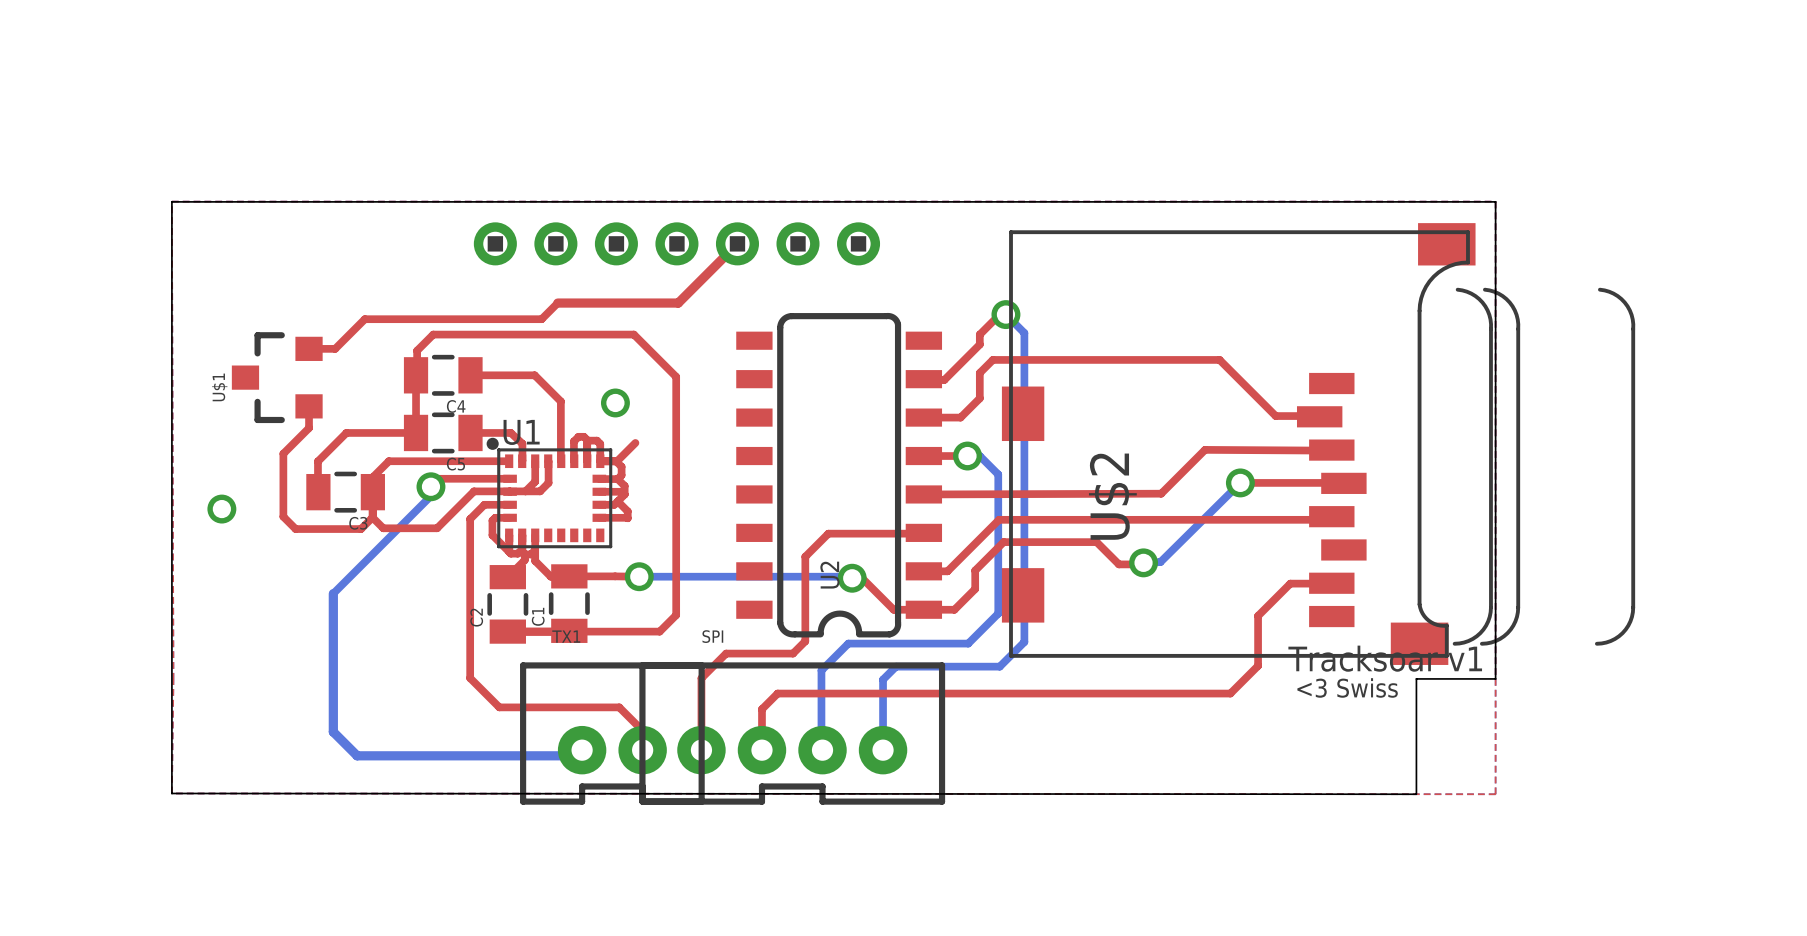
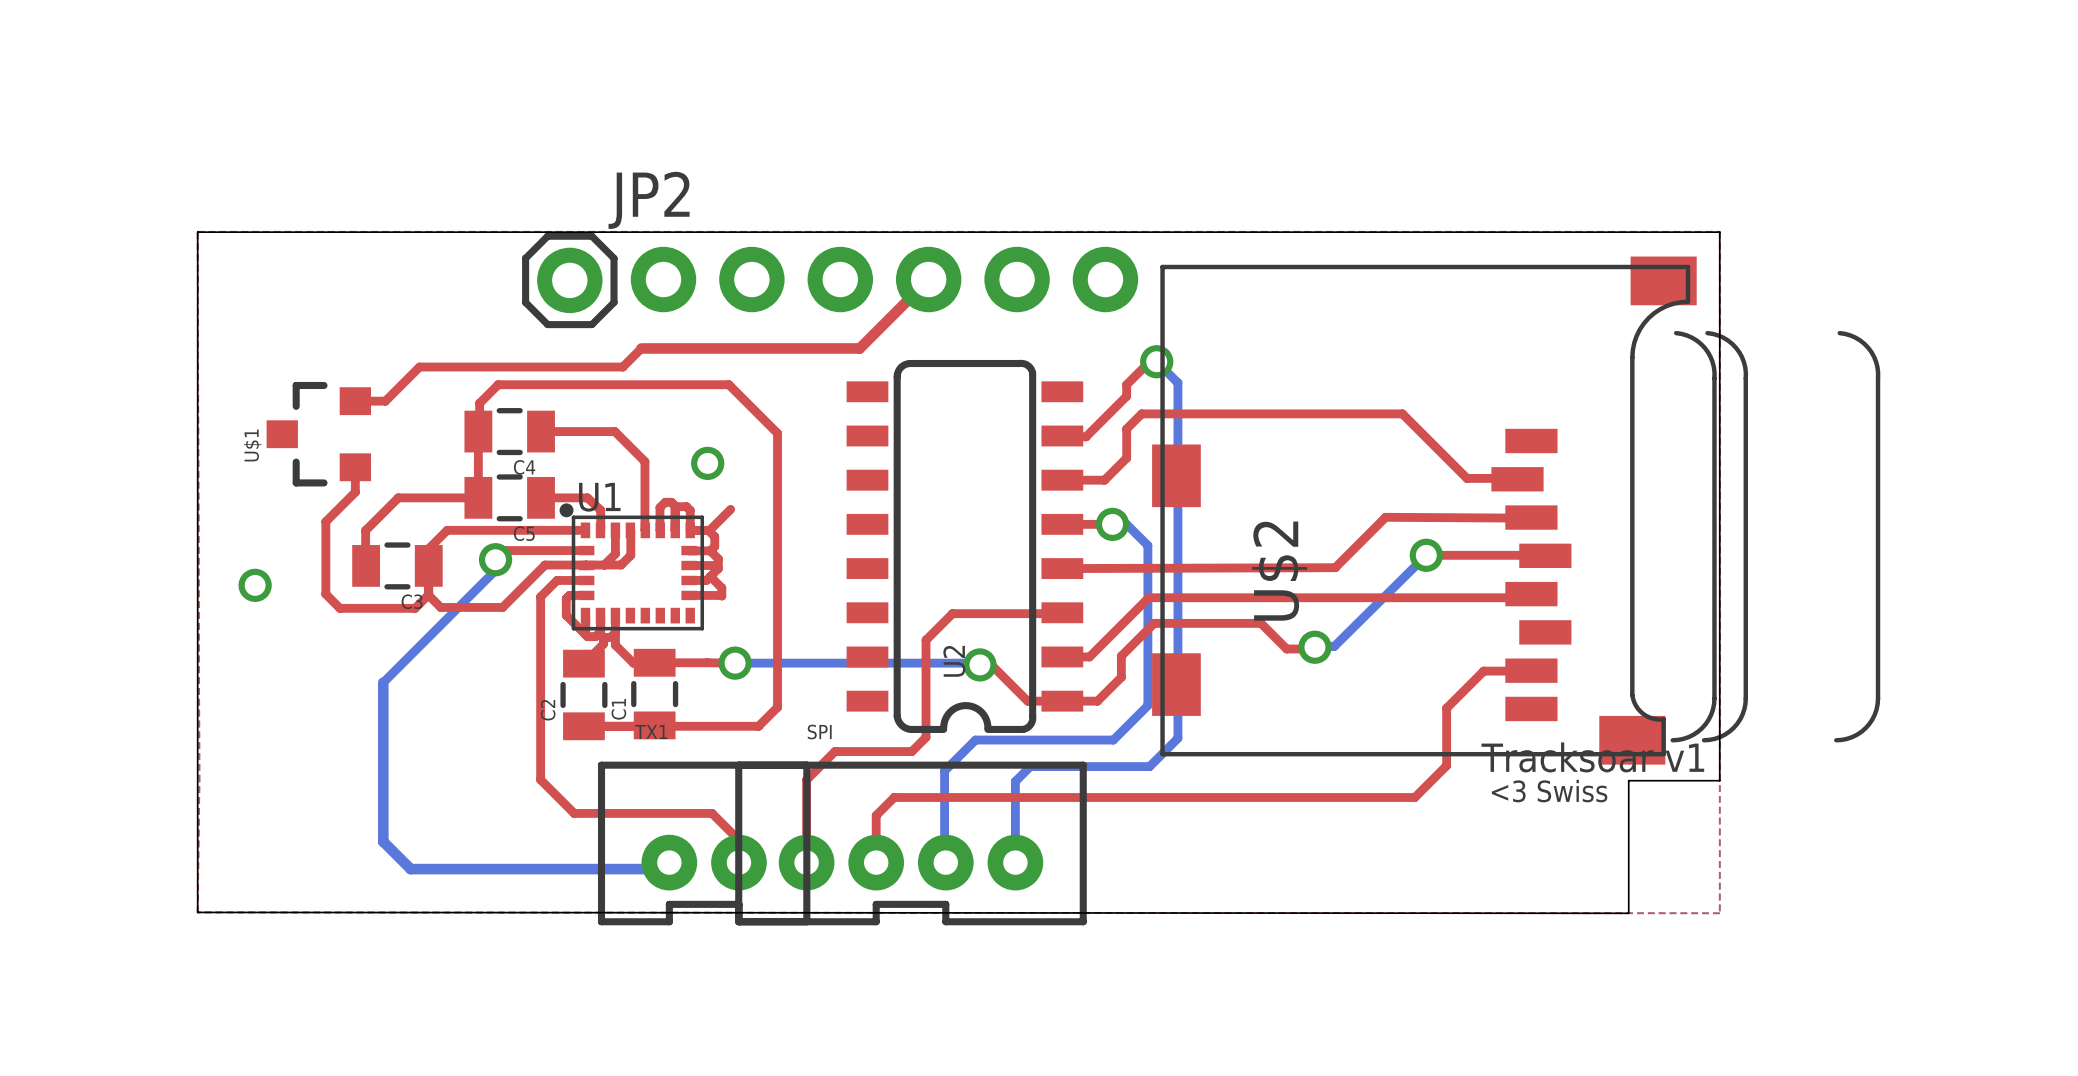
JP2: none -> (569, 280)
part: (676, 243) -> none
top track: (737, 243) (678, 303) -> (927, 280) (859, 348) (779, 348)
part: none -> (884, 279)

